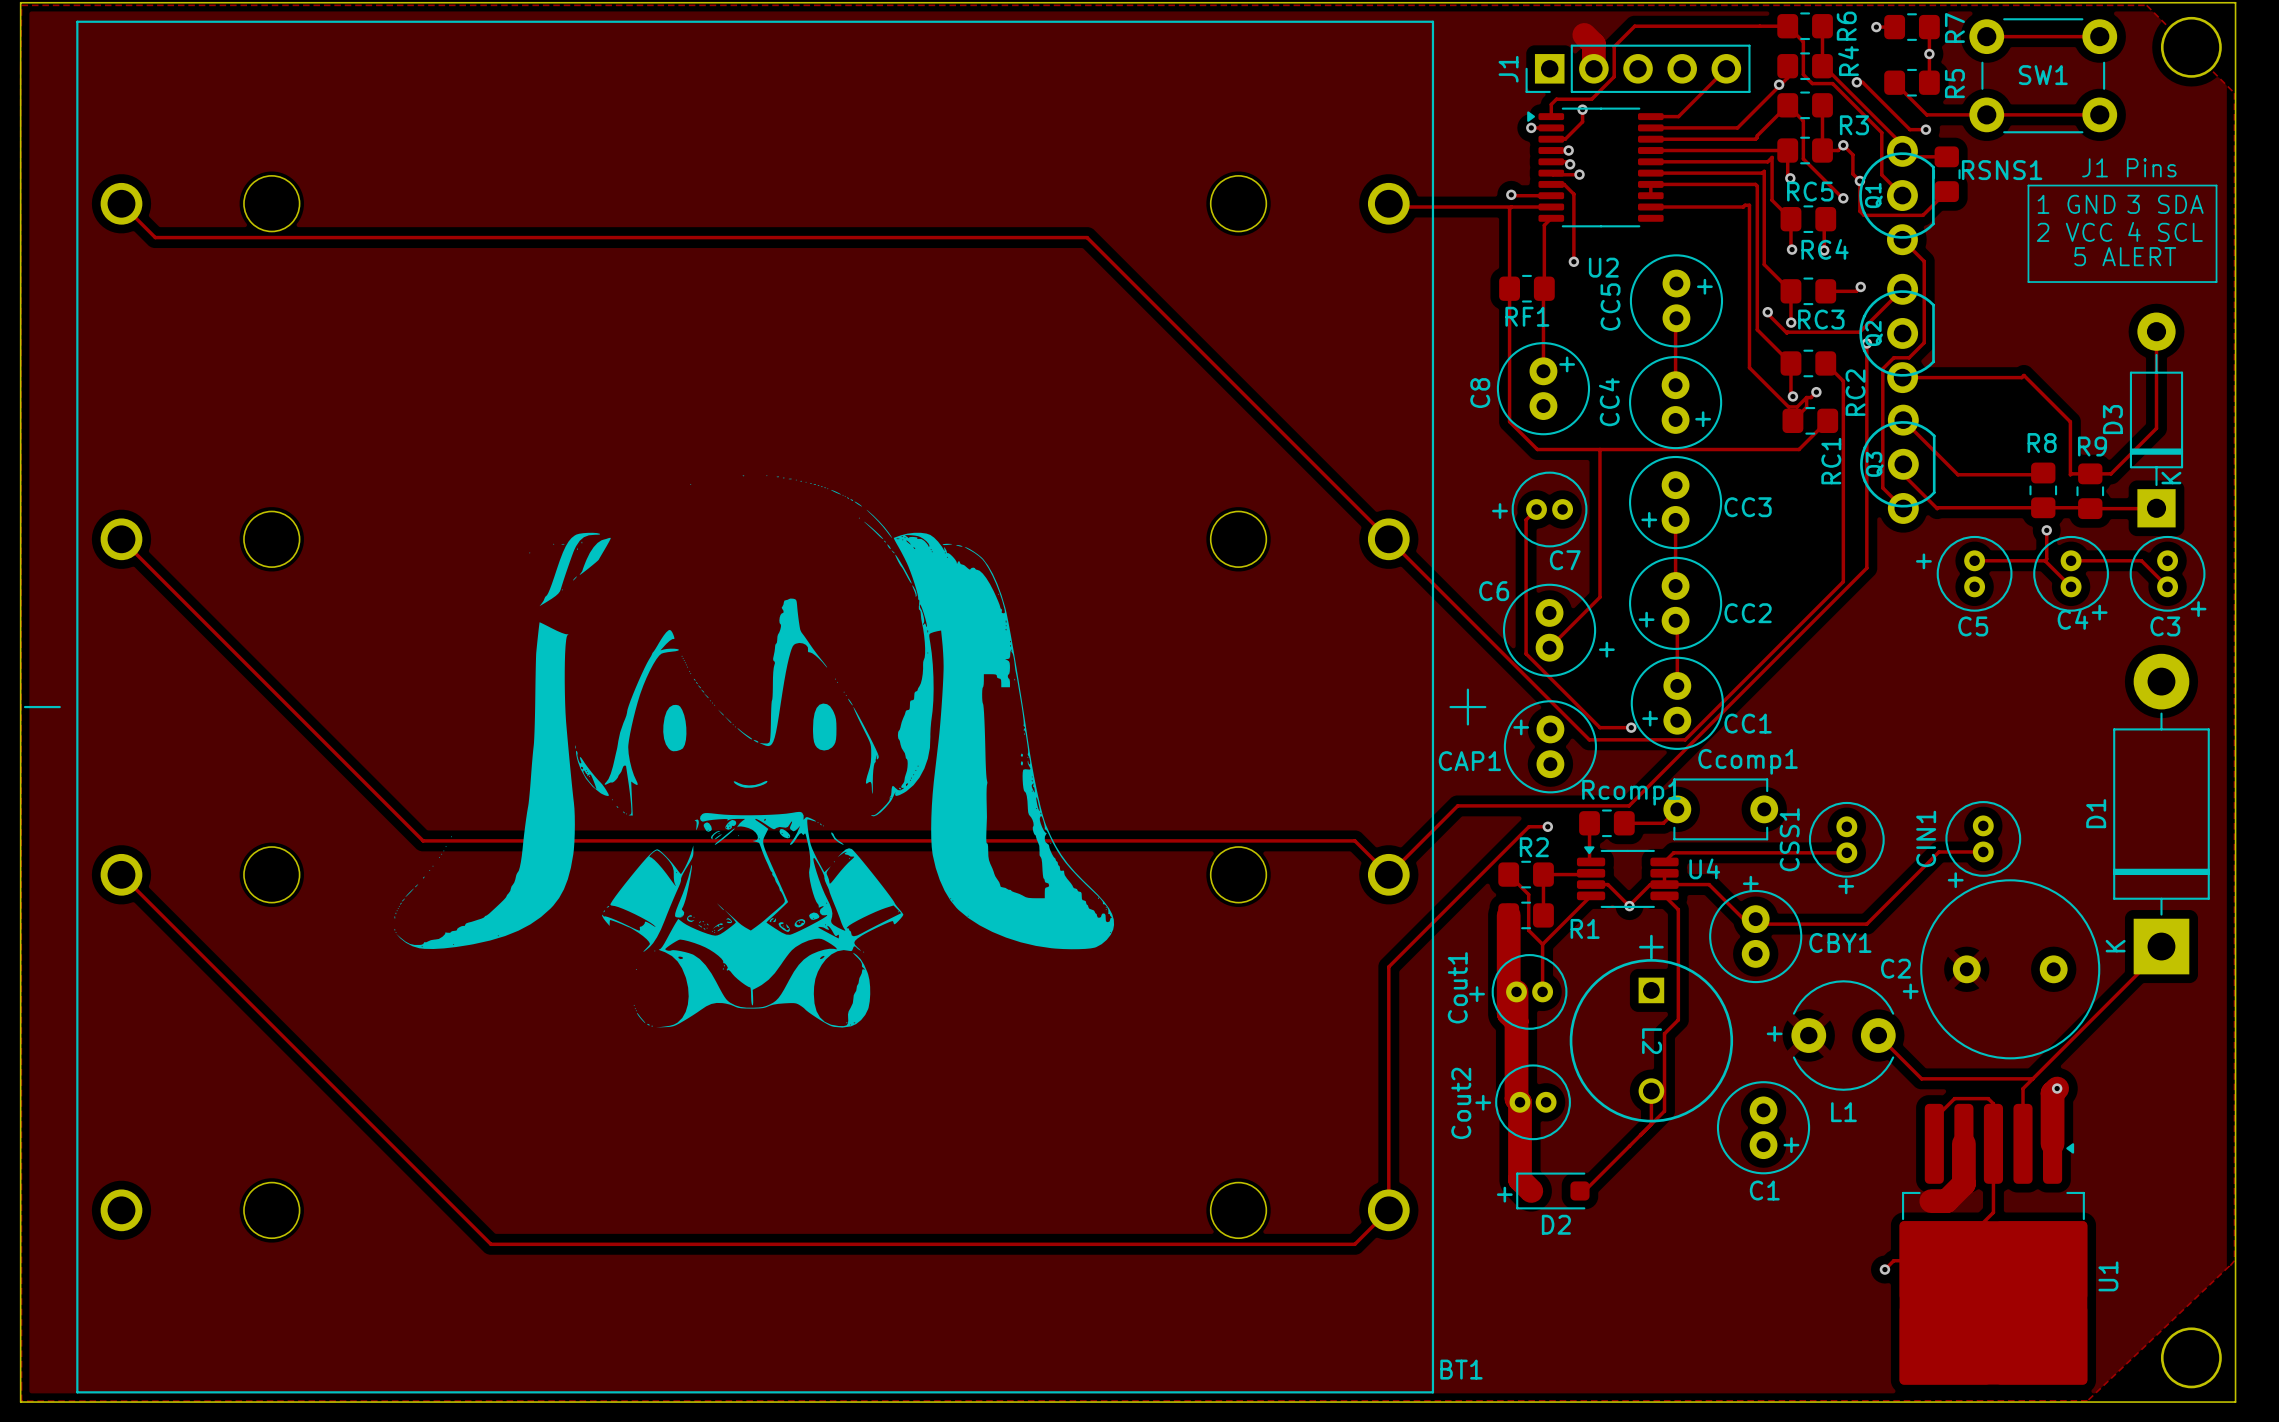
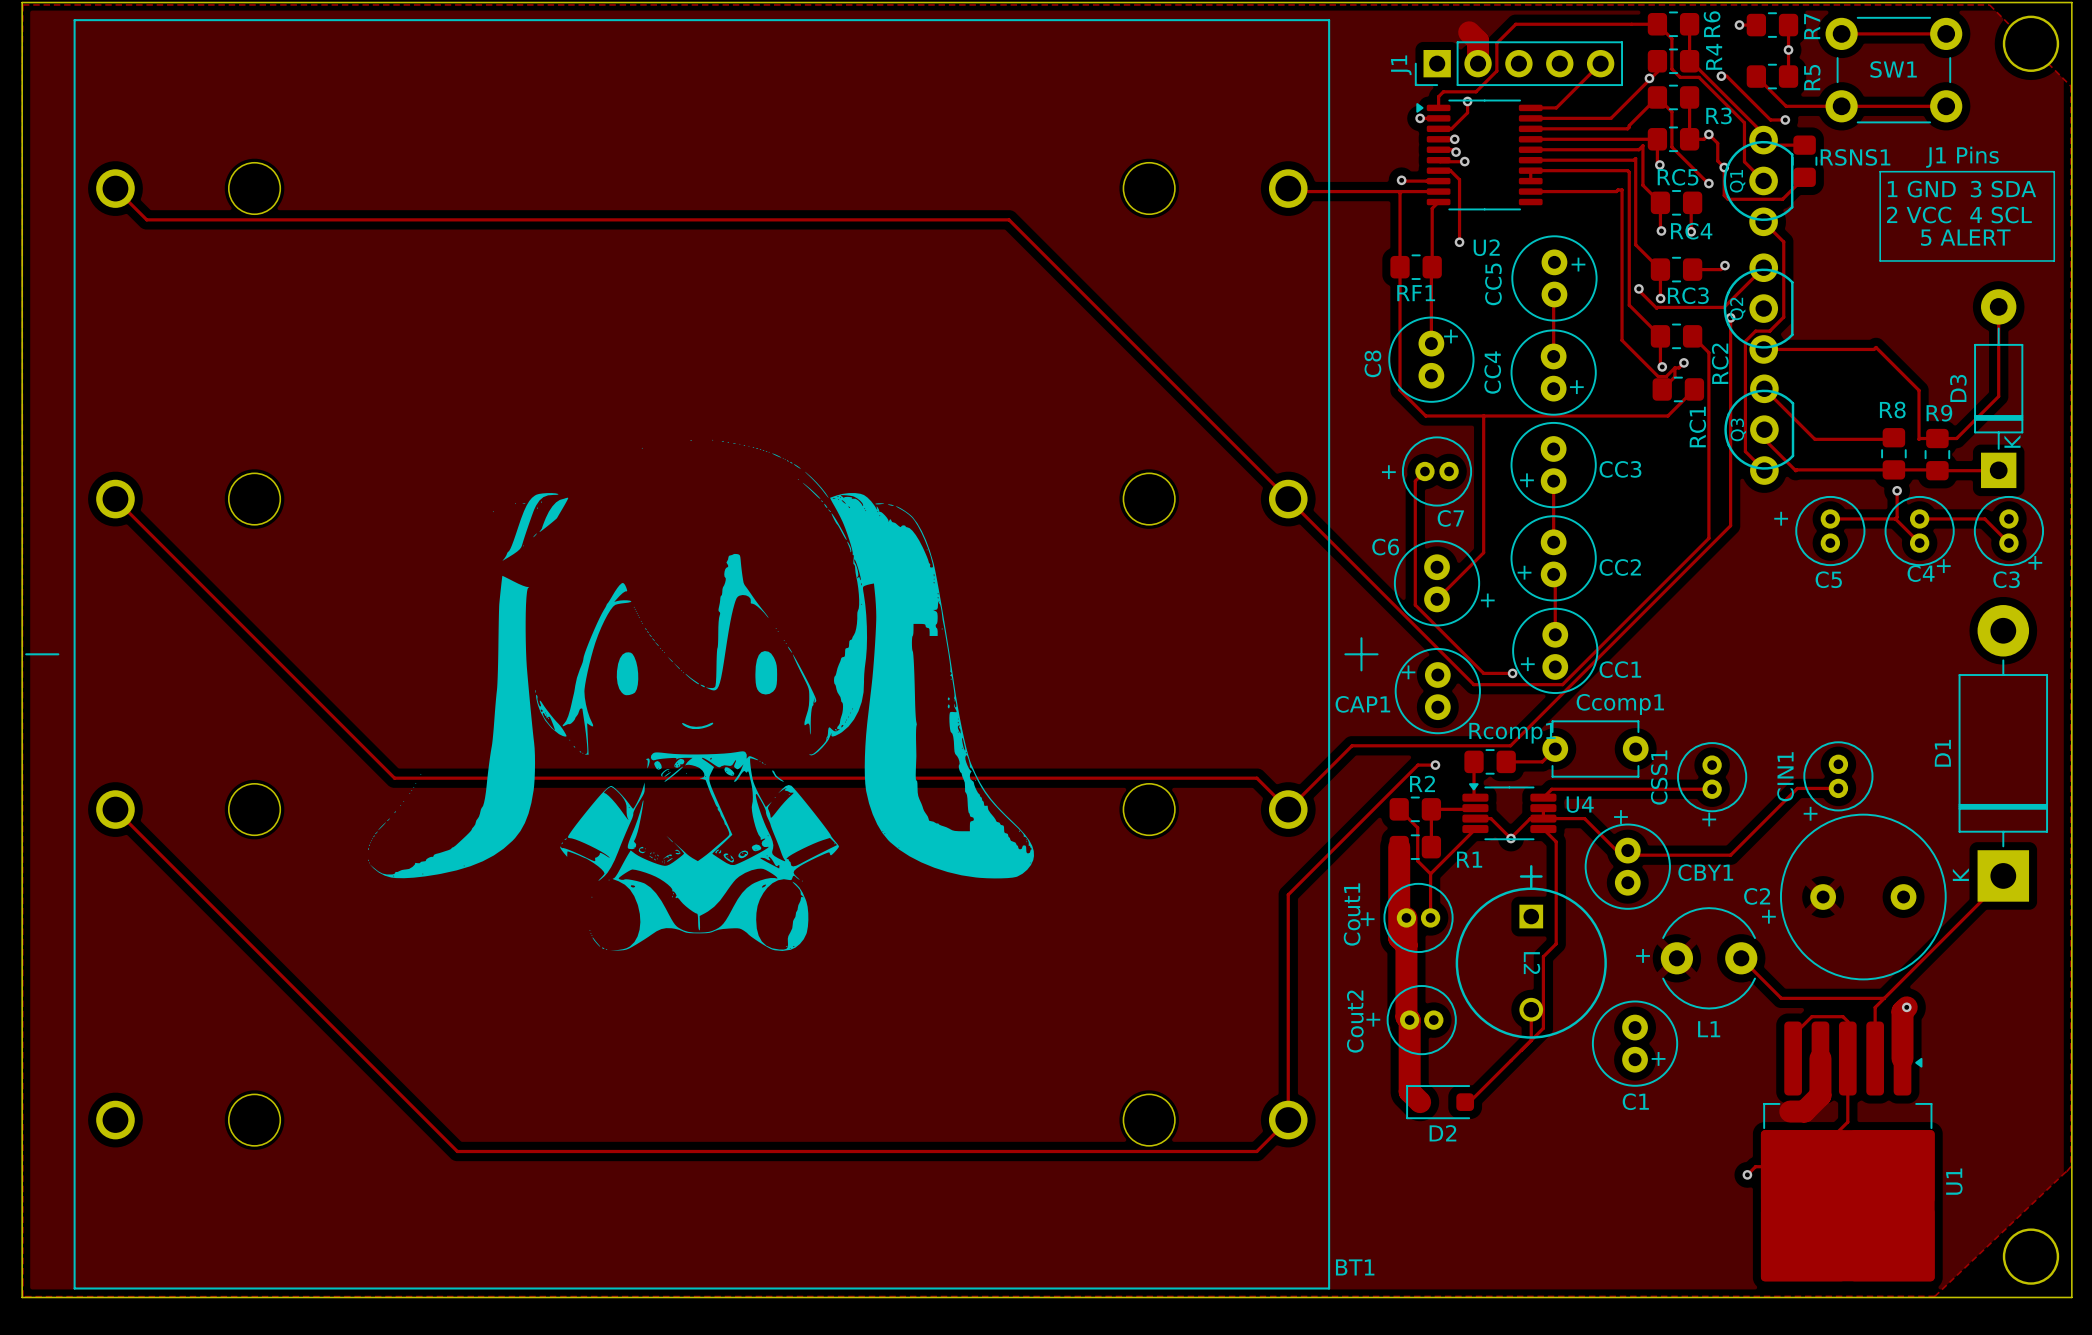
text: + (1504, 1194) -> none

